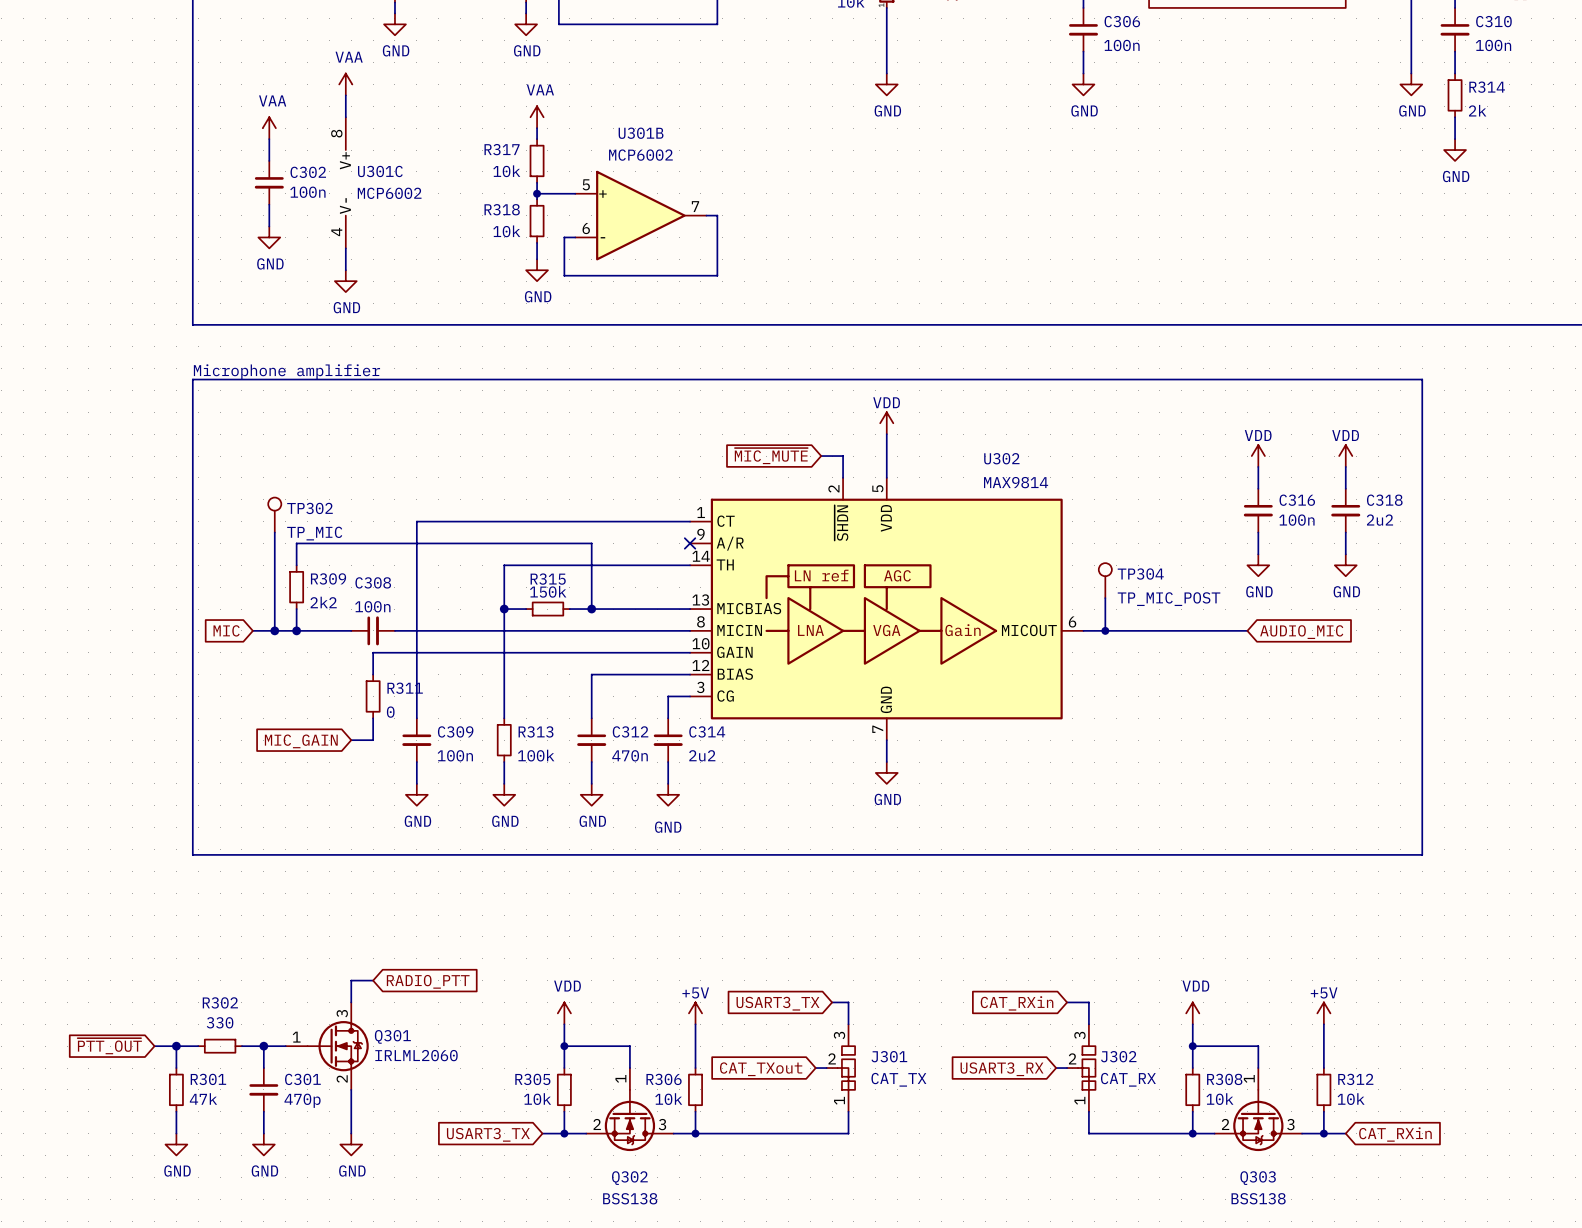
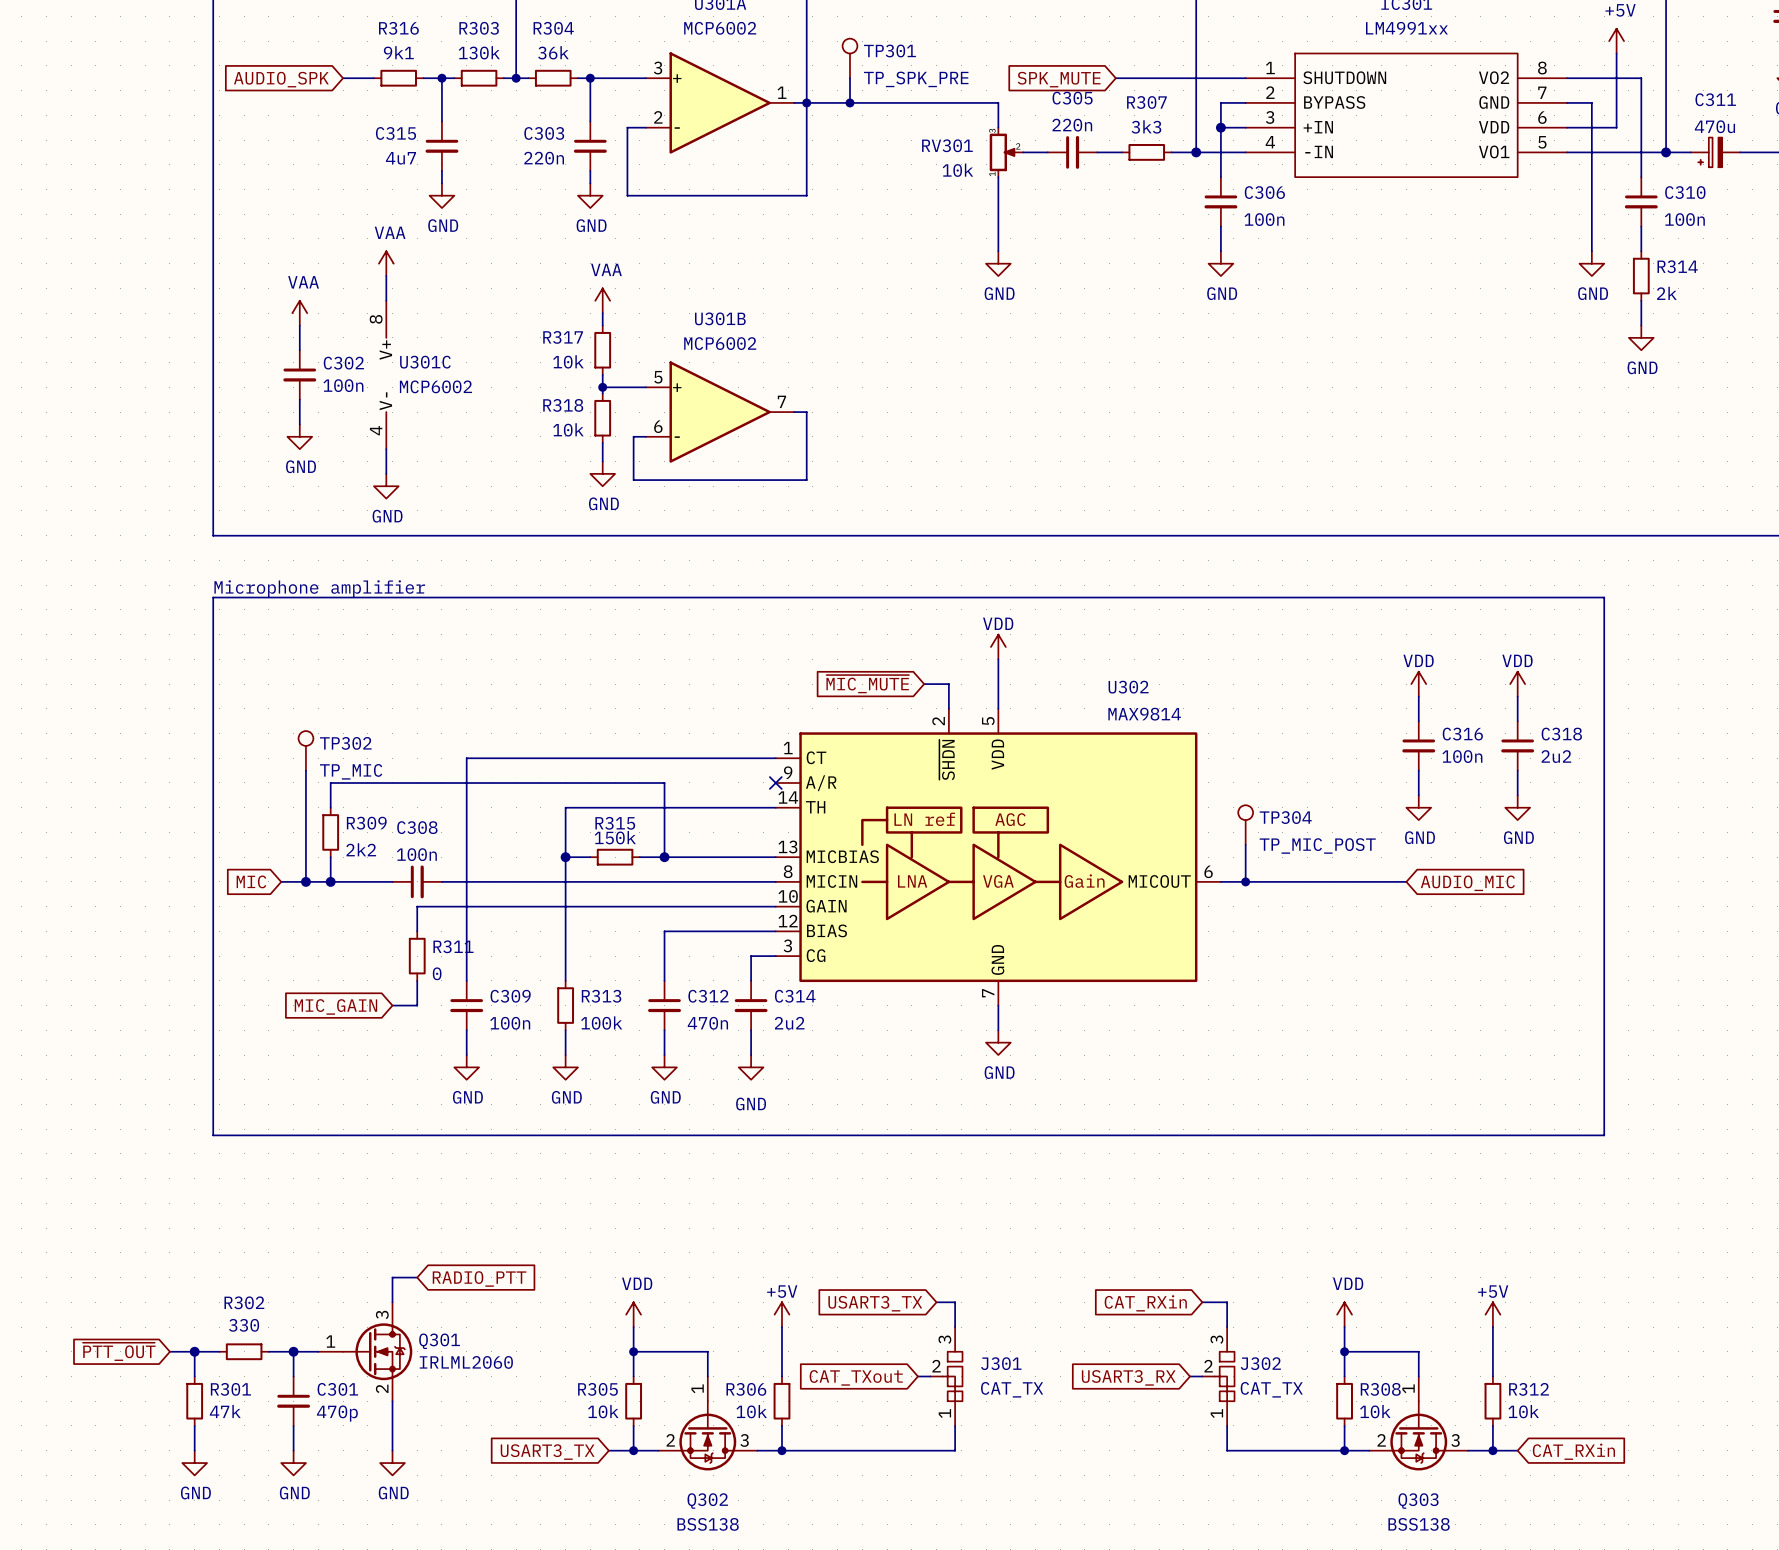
J302 value: CAT_RX (1128, 1079) -> CAT_TX (1271, 1389)

